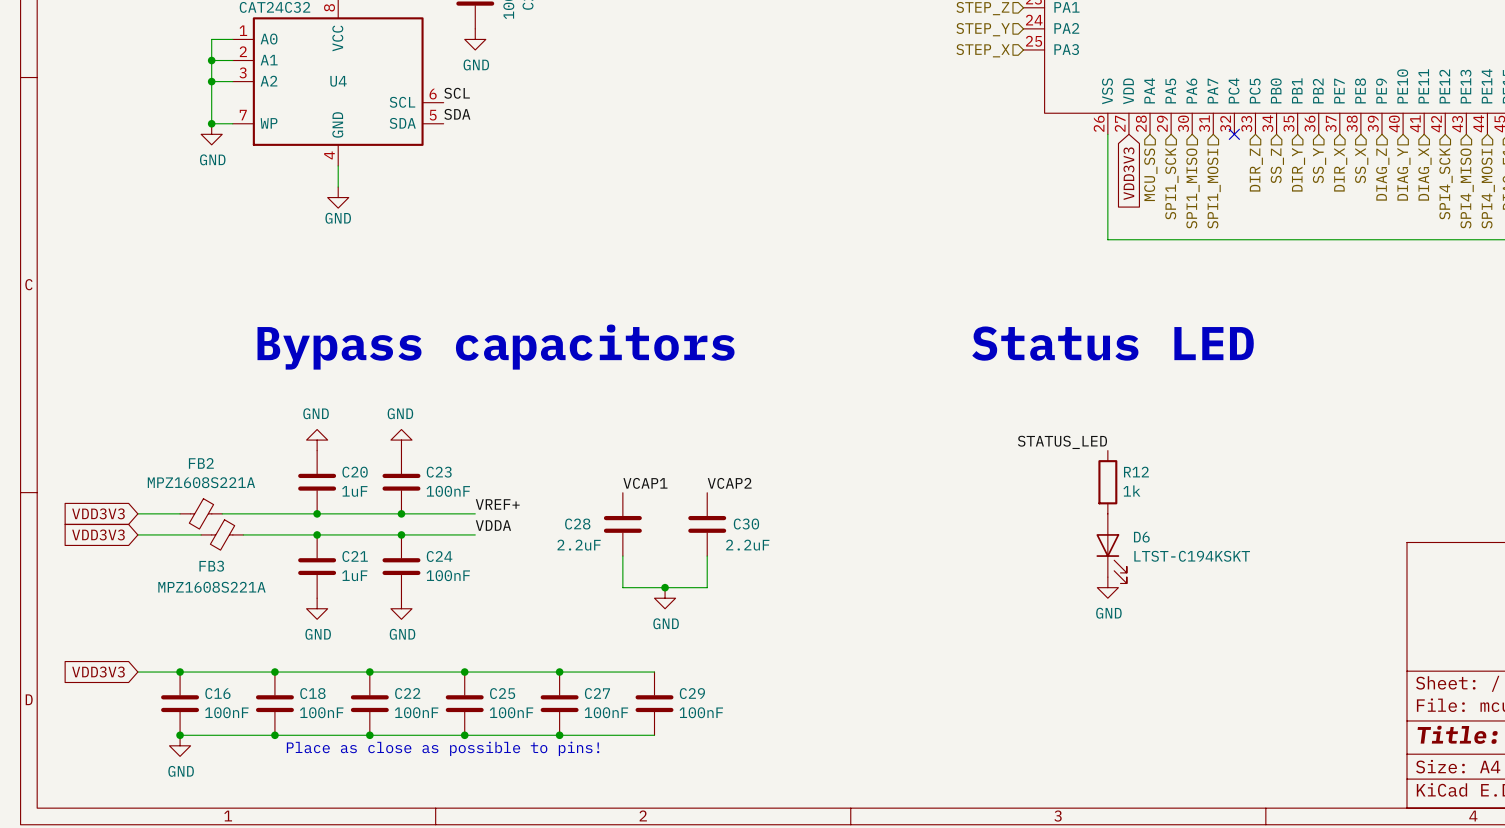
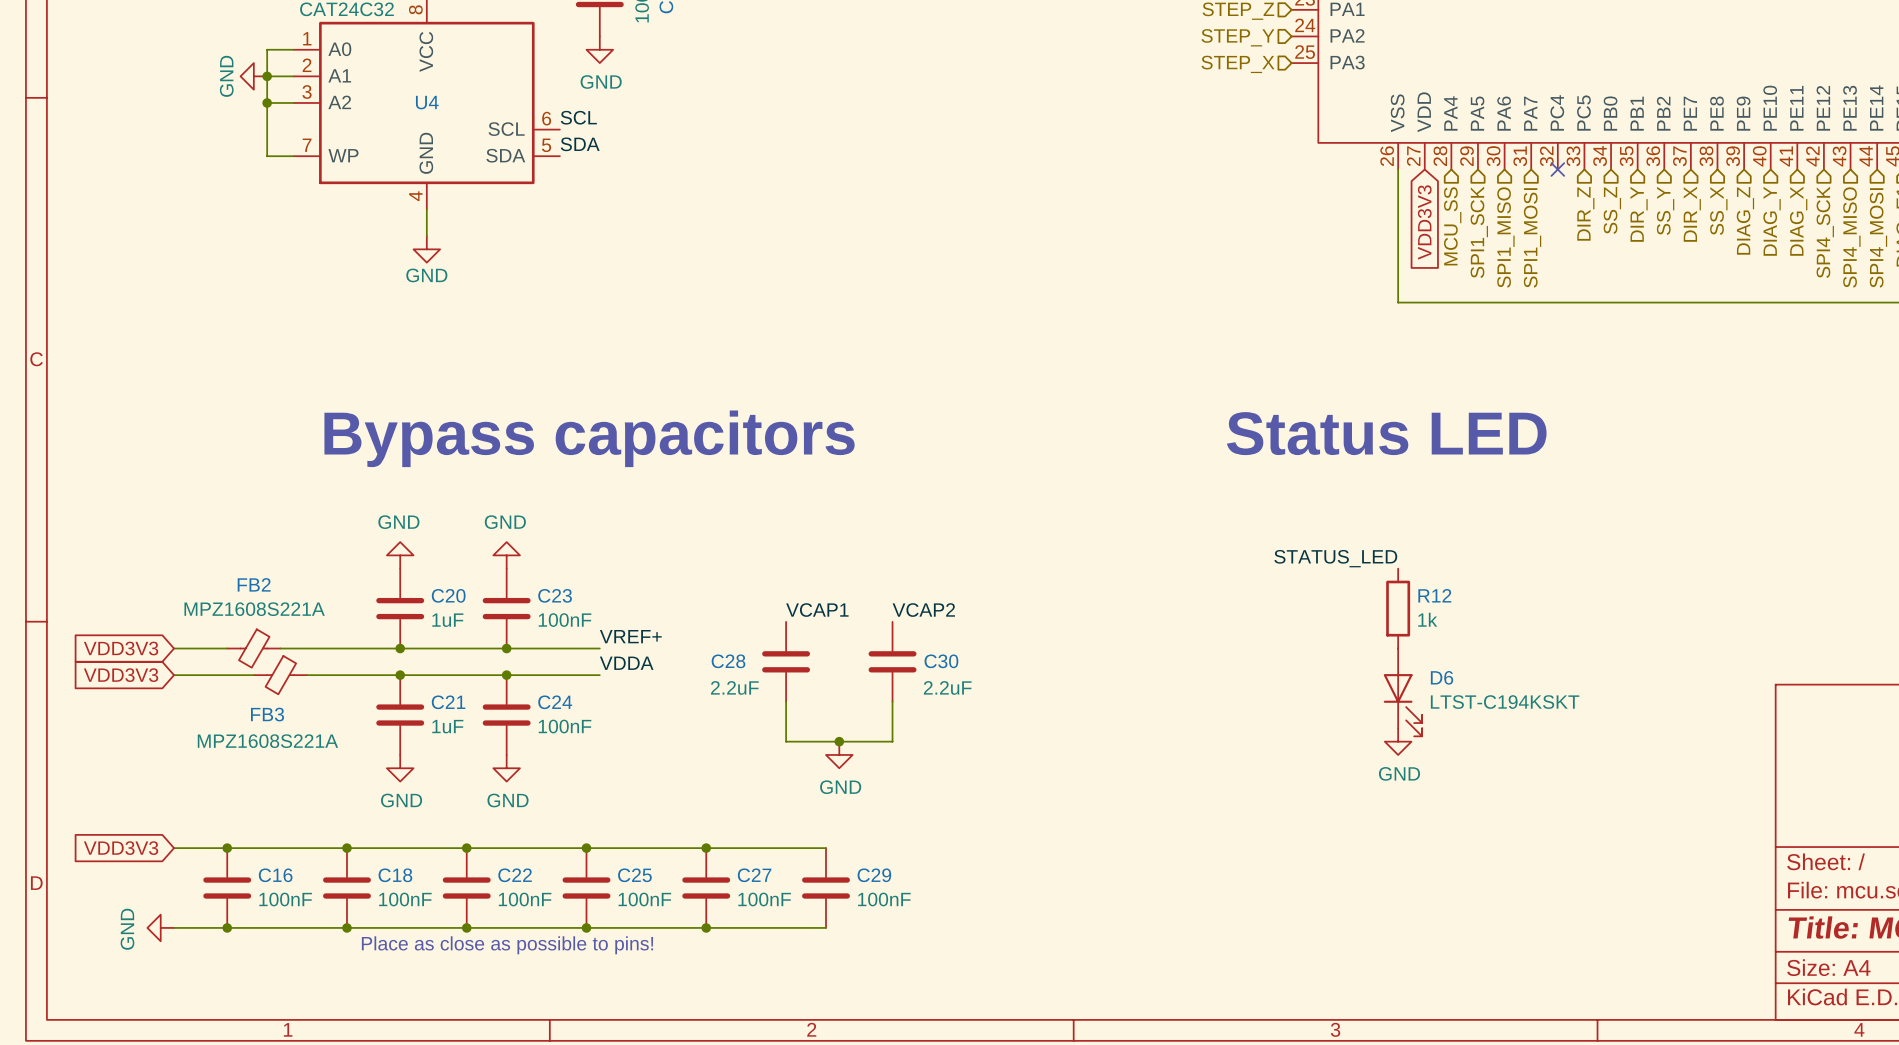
junction: (211, 123) -> none
power symbol rotation: 0° (211, 134) -> 90° clockwise (253, 76)
power symbol position: GND (211, 134) -> GND (253, 76)
wire: none -> (174, 927) (227, 927)
power symbol rotation: 0° (180, 745) -> 90° clockwise (160, 927)
power symbol position: GND (180, 745) -> GND (160, 927)

